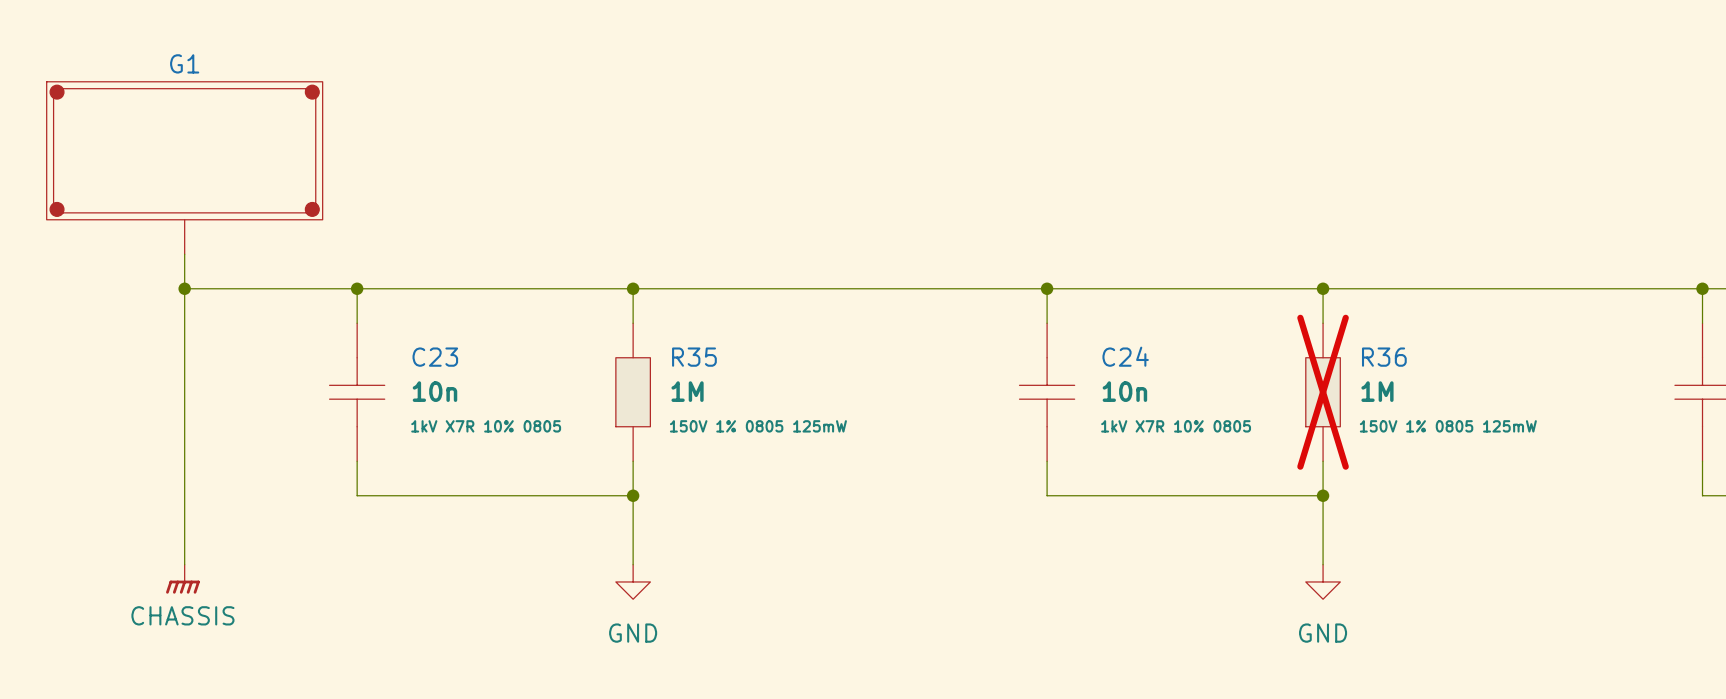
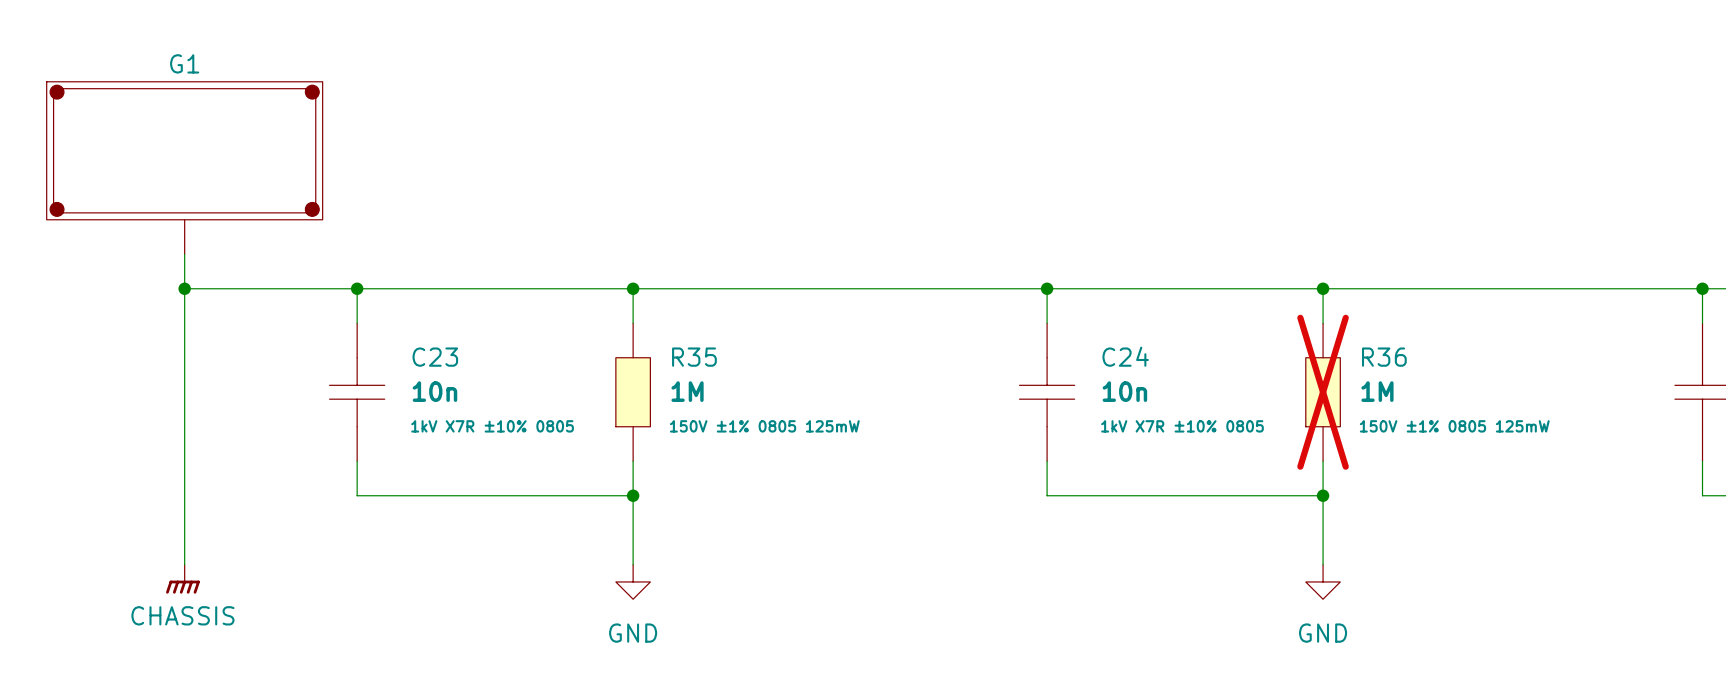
C23 text: 1kV X7R 10% 0805 (486, 426) -> 1kV X7R ±10% 0805 (492, 426)
R35 text: 150V 1% 0805 125mW (758, 426) -> 150V ±1% 0805 125mW (764, 426)
C24 text: 1kV X7R 10% 0805 (1176, 426) -> 1kV X7R ±10% 0805 (1182, 426)
R36 text: 150V 1% 0805 125mW (1448, 426) -> 150V ±1% 0805 125mW (1454, 426)

